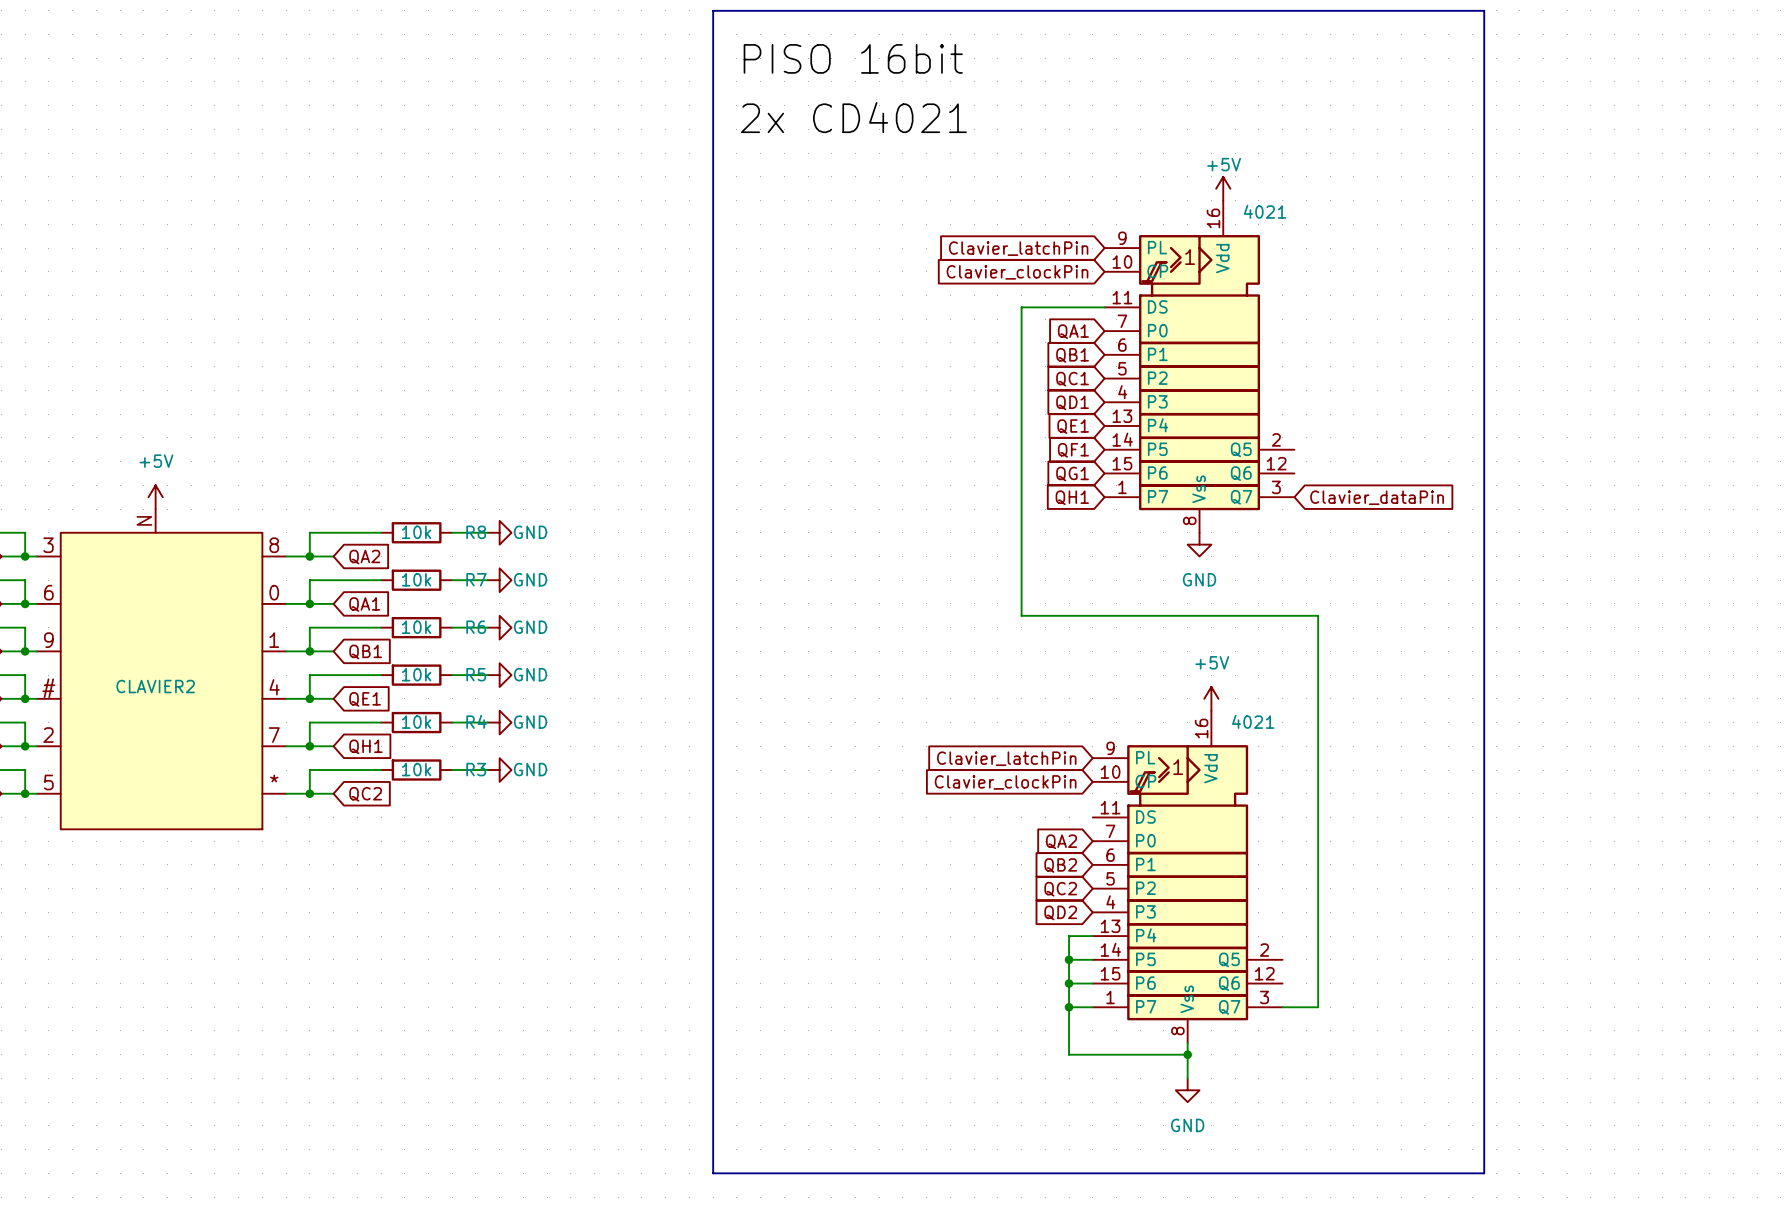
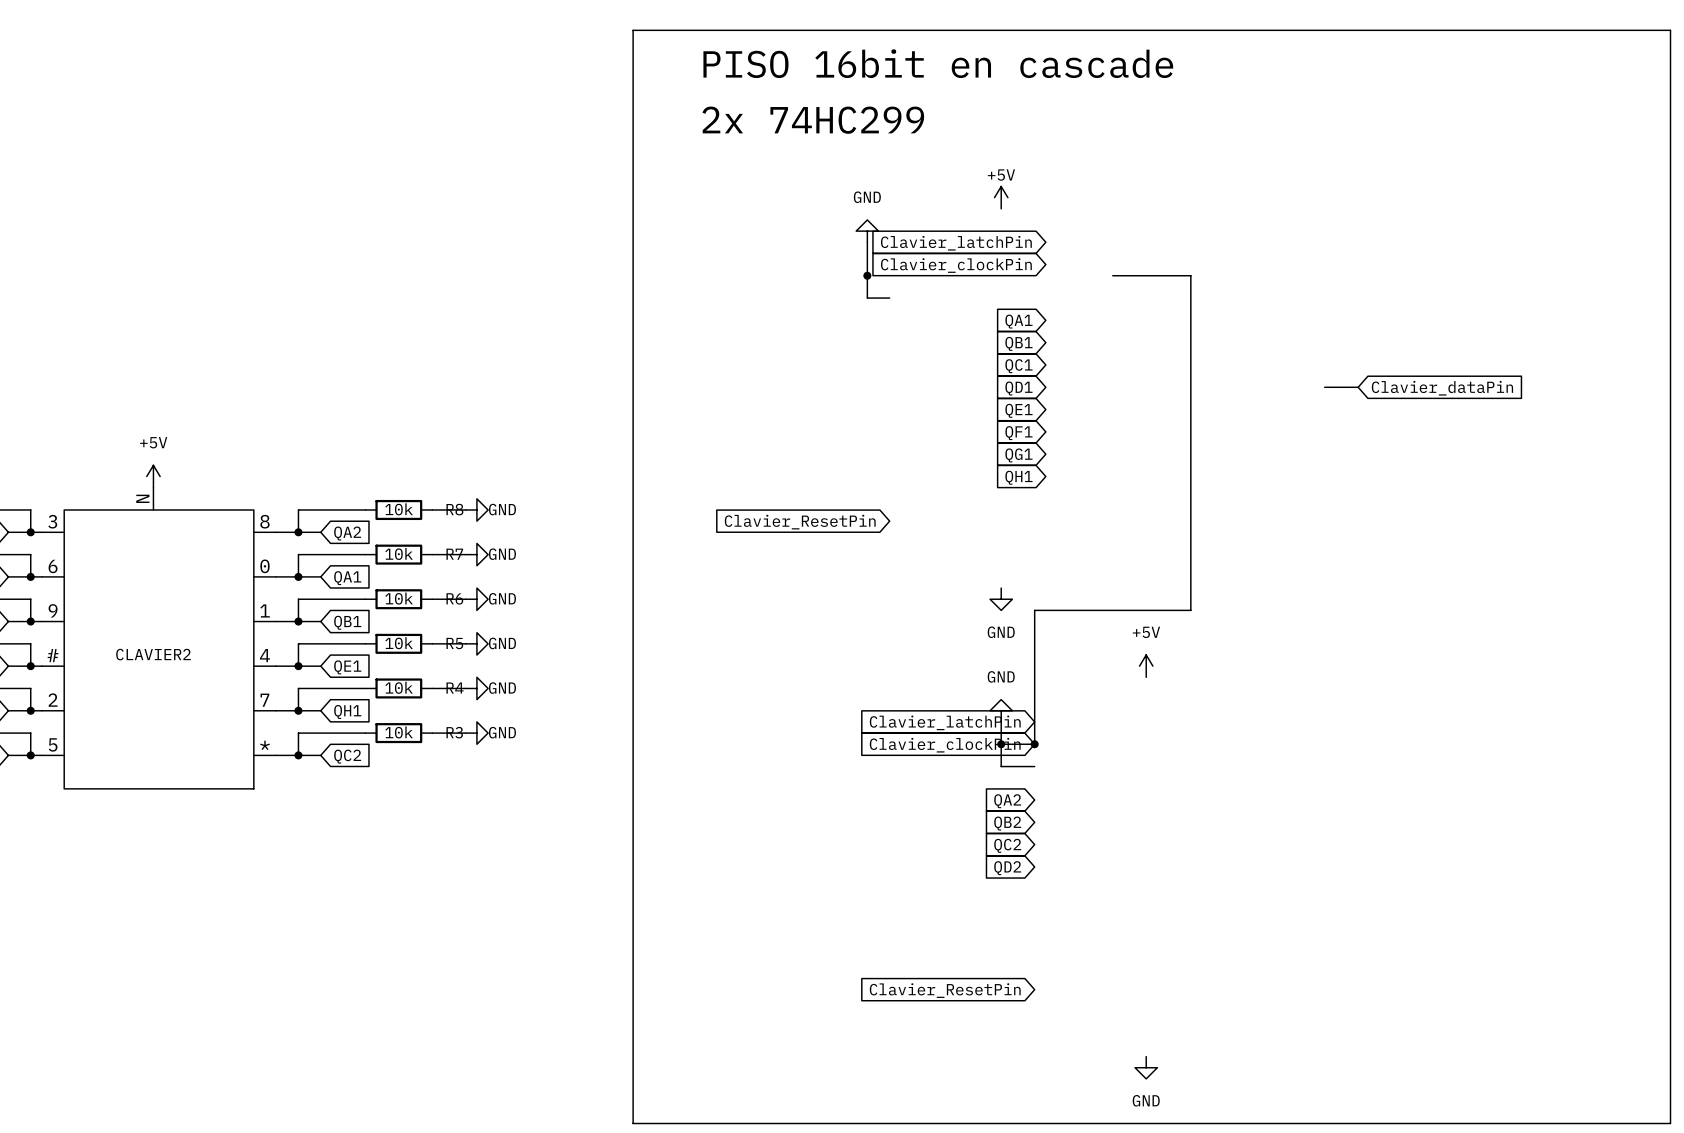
line: (713, 10) (1484, 10) (1484, 1173) (713, 1173) (713, 10) -> (633, 30) (633, 1123) (1670, 1123) (1670, 30) (633, 30)
label: PISO 16bit (853, 58) -> PISO 16bit en cascade (938, 63)
label: 2x CD4021 (853, 117) -> 2x 74HC299 (813, 120)
power symbol position: +5V (1223, 188) -> +5V (1001, 197)
power symbol: none -> GND (867, 231)
wire: none -> (867, 242) (867, 298) (889, 298)
junction: none -> (867, 275)
wire: none -> (1112, 275) (1190, 275) (1190, 610) (1034, 610) (1034, 744) (1001, 744)
wire: (1104, 307) (1021, 307) (1021, 615) (1318, 615) (1318, 1007) (1282, 1007) -> none
part: 4021 (1199, 366) -> none
wire: none -> (1324, 387) (1358, 387)
global label position: Clavier_dataPin (1377, 497) -> Clavier_dataPin (1442, 388)
power symbol: GND (1199, 544) -> none
global label: none -> Clavier_ResetPin (800, 522)
power symbol: none -> GND (1001, 599)
power symbol: none -> GND (1001, 710)
wire: none -> (1001, 721) (1001, 766) (1034, 766)
junction: none -> (1001, 744)
junction: none -> (1034, 744)
part: 4021 (1187, 876) -> none
wire: (1092, 936) (1069, 936) (1069, 1054) (1187, 1054) -> none
wire: (1069, 959) (1092, 959) -> none
junction: (1069, 959) -> none
wire: (1069, 983) (1092, 983) -> none
junction: (1069, 983) -> none
wire: (1069, 1007) (1092, 1007) -> none
junction: (1069, 1007) -> none
wire: (1187, 1042) (1187, 1078) -> none
global label: none -> Clavier_ResetPin (945, 990)
junction: (1187, 1054) -> none
power symbol position: GND (1187, 1090) -> GND (1146, 1067)

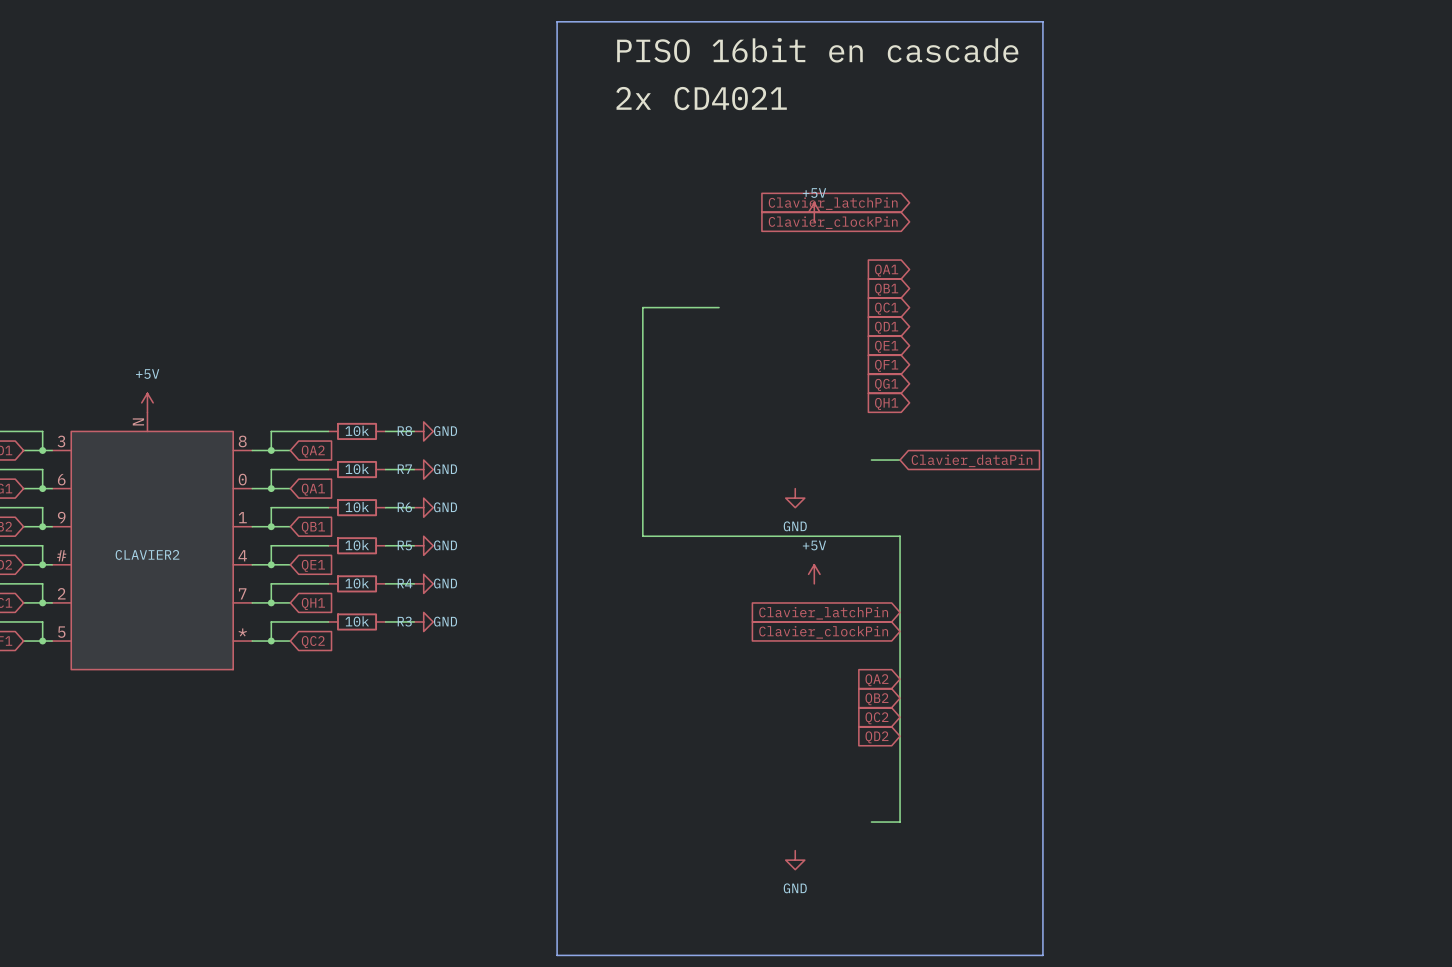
line: (1202, 30) (1670, 30) (1670, 1123) (1202, 1123) -> (1042, 21) (1042, 955)
label: 2x 74HC299 (813, 120) -> 2x CD4021 (701, 98)
power symbol position: +5V (1001, 197) -> +5V (814, 212)
power symbol: GND (867, 231) -> none
wire: (867, 242) (867, 298) (889, 298) -> none
junction: (867, 275) -> none
wire: (1112, 275) (1190, 275) (1190, 610) (1034, 610) (1034, 632) -> (719, 307) (642, 307) (642, 536) (900, 536)
wire: (1324, 387) (1358, 387) -> none
global label: Clavier_dataPin (1442, 388) -> none
global label: Clavier_ResetPin (800, 522) -> none
wire: none -> (871, 460) (900, 460)
global label: none -> Clavier_dataPin (972, 460)
power symbol: none -> GND (795, 498)
power symbol: GND (1001, 599) -> none
power symbol position: +5V (1146, 666) -> +5V (814, 574)
power symbol: GND (1001, 710) -> none
wire: (1001, 721) (1001, 766) (1034, 766) -> none
wire: (1001, 744) (1034, 744) -> (871, 822) (900, 822) (900, 631)
junction: (1001, 744) -> none
junction: (1034, 744) -> none
global label: Clavier_ResetPin (945, 990) -> none
power symbol: none -> GND (795, 860)
power symbol: GND (1146, 1067) -> none

